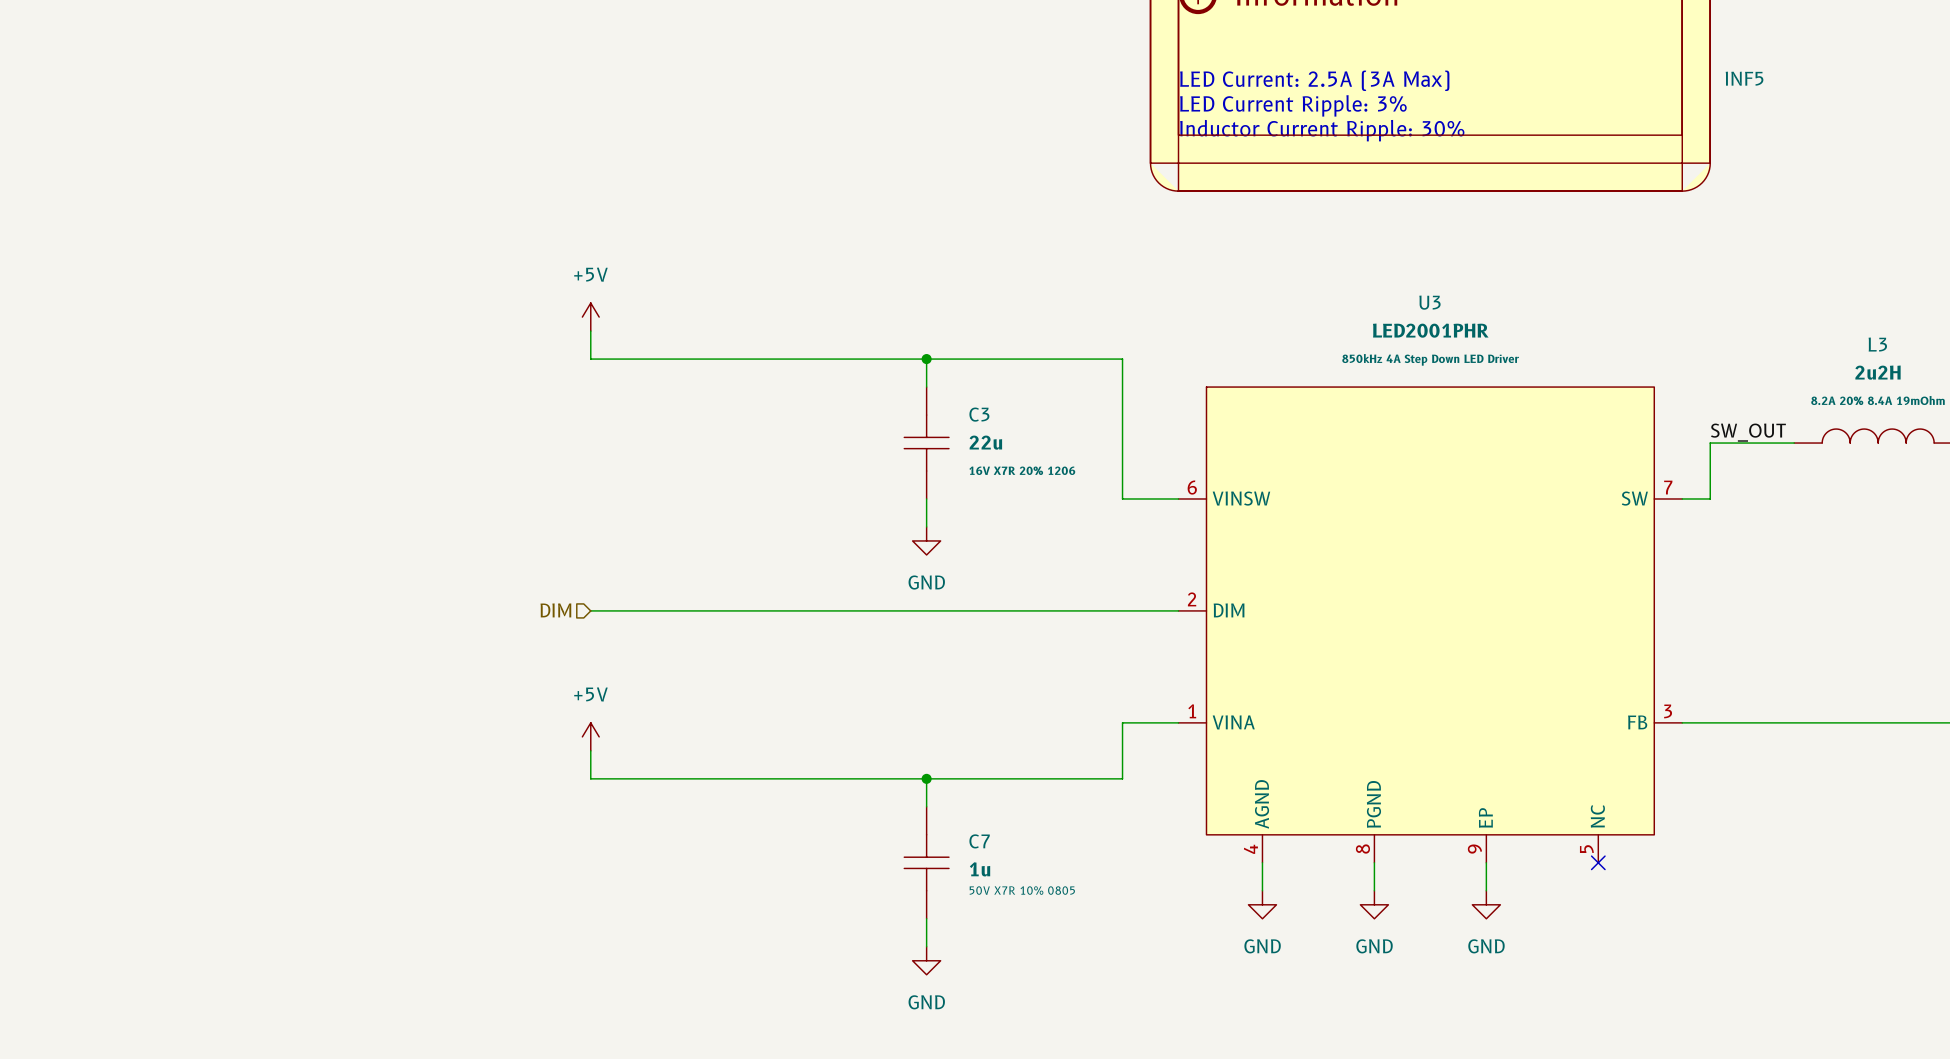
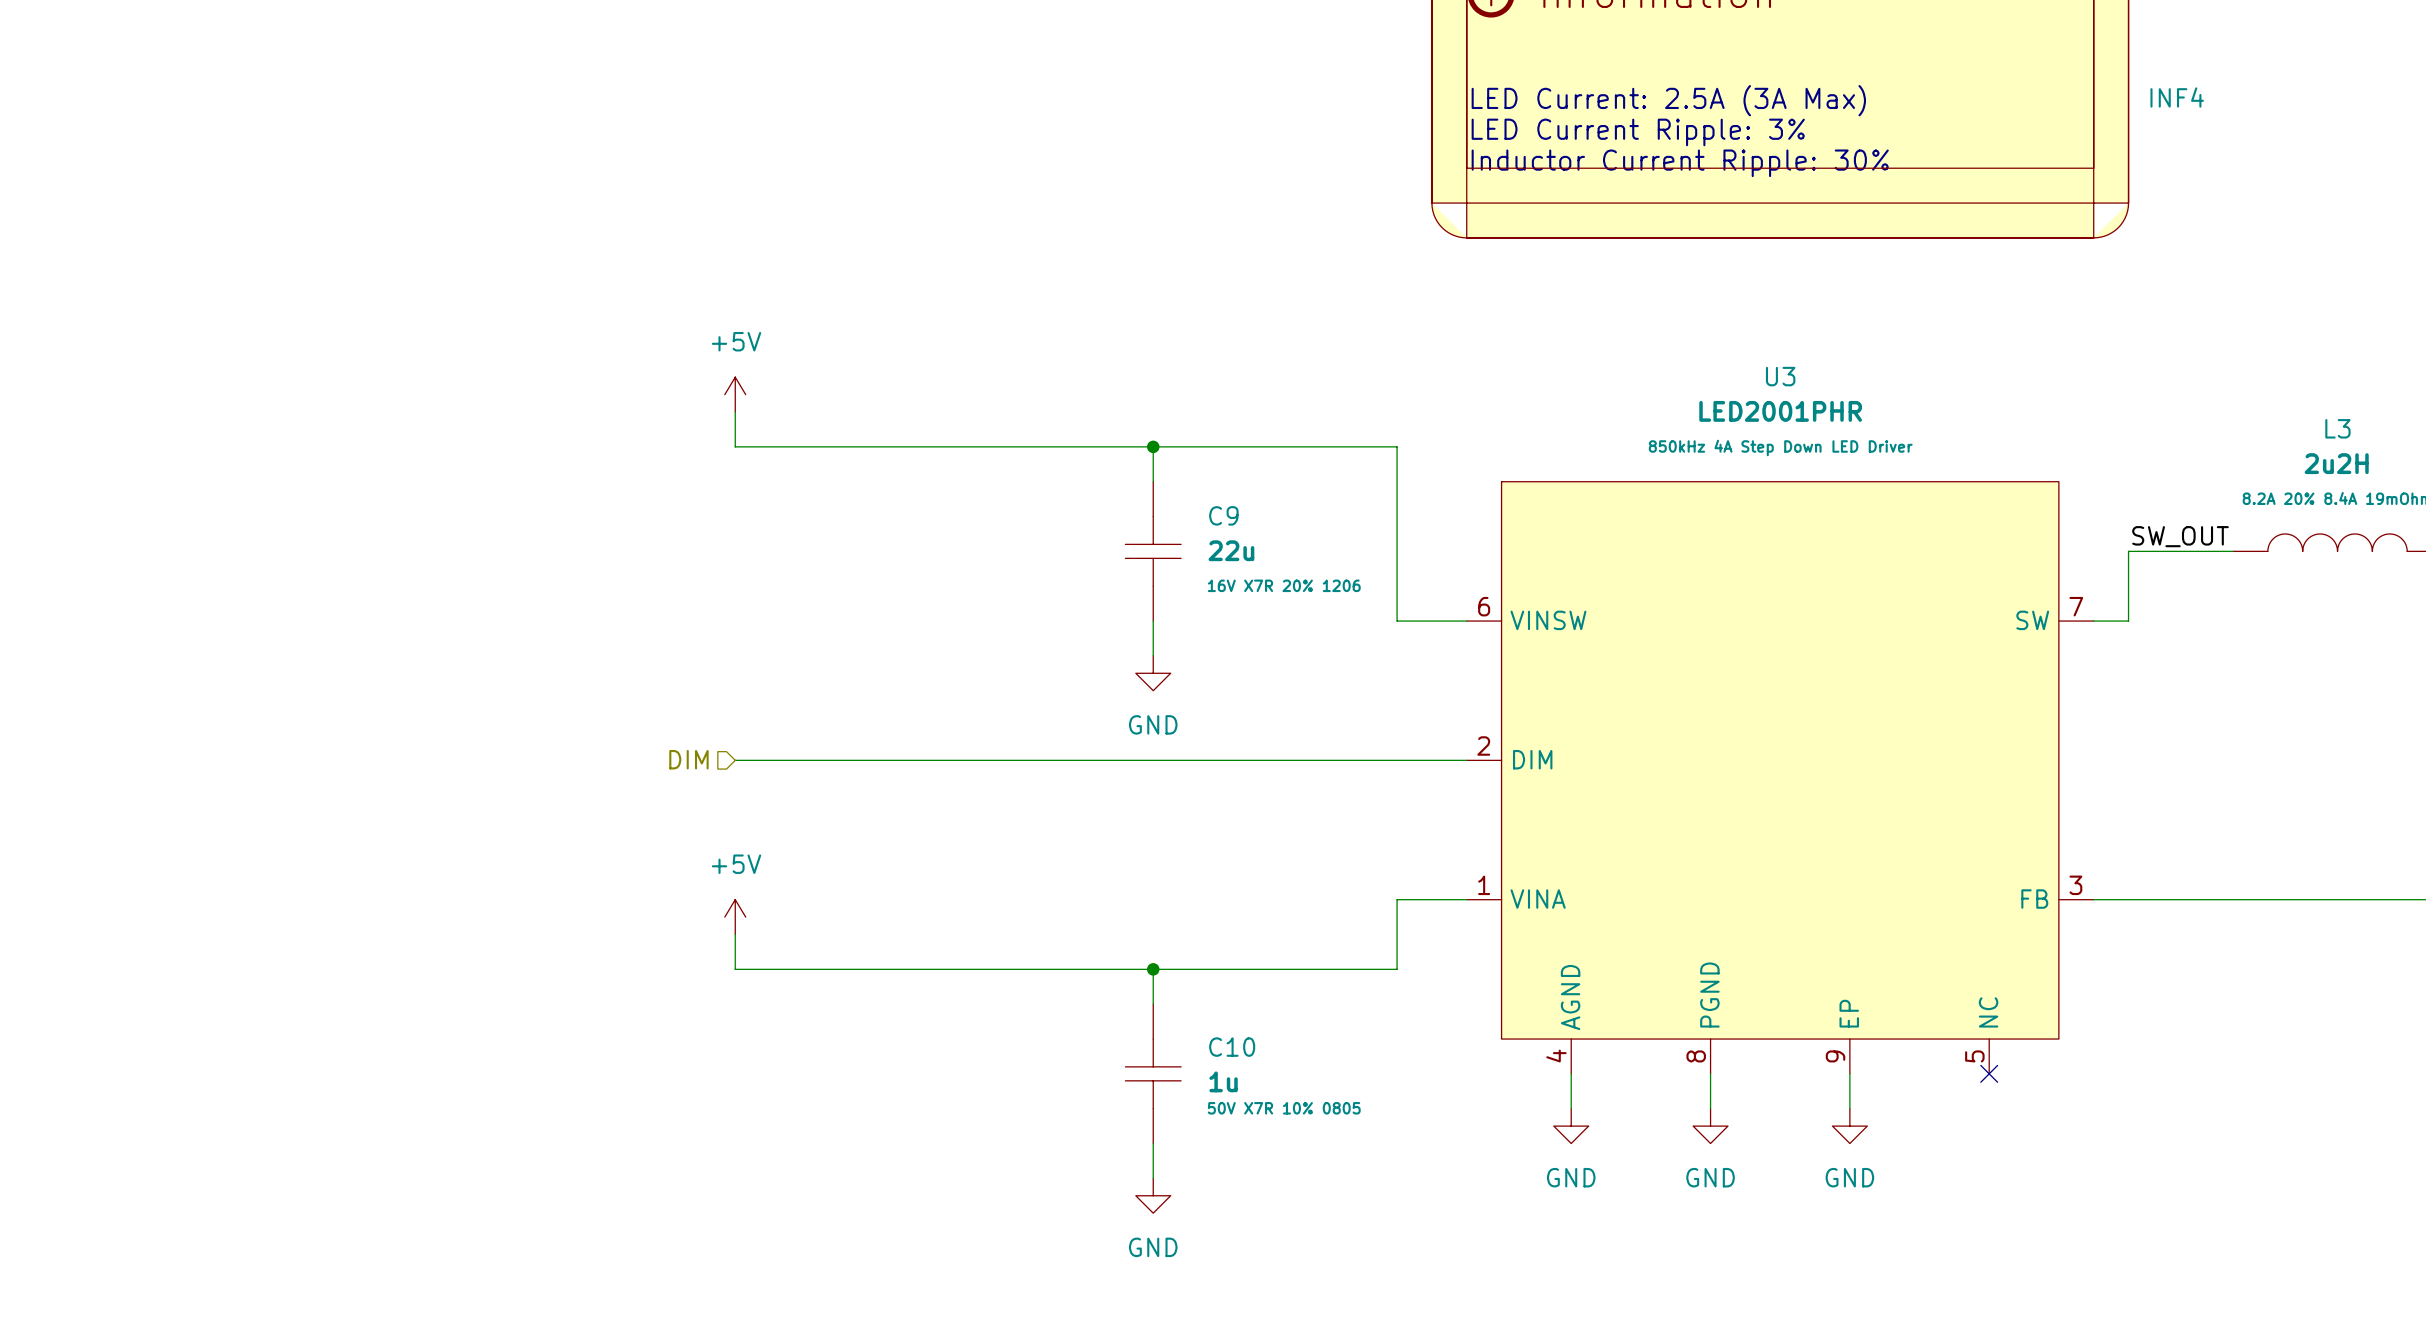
INF5 name: INF5 (1744, 78) -> INF4 (2177, 97)
C3 name: C3 (979, 414) -> C9 (1223, 515)
C7 name: C7 (979, 841) -> C10 (1232, 1047)

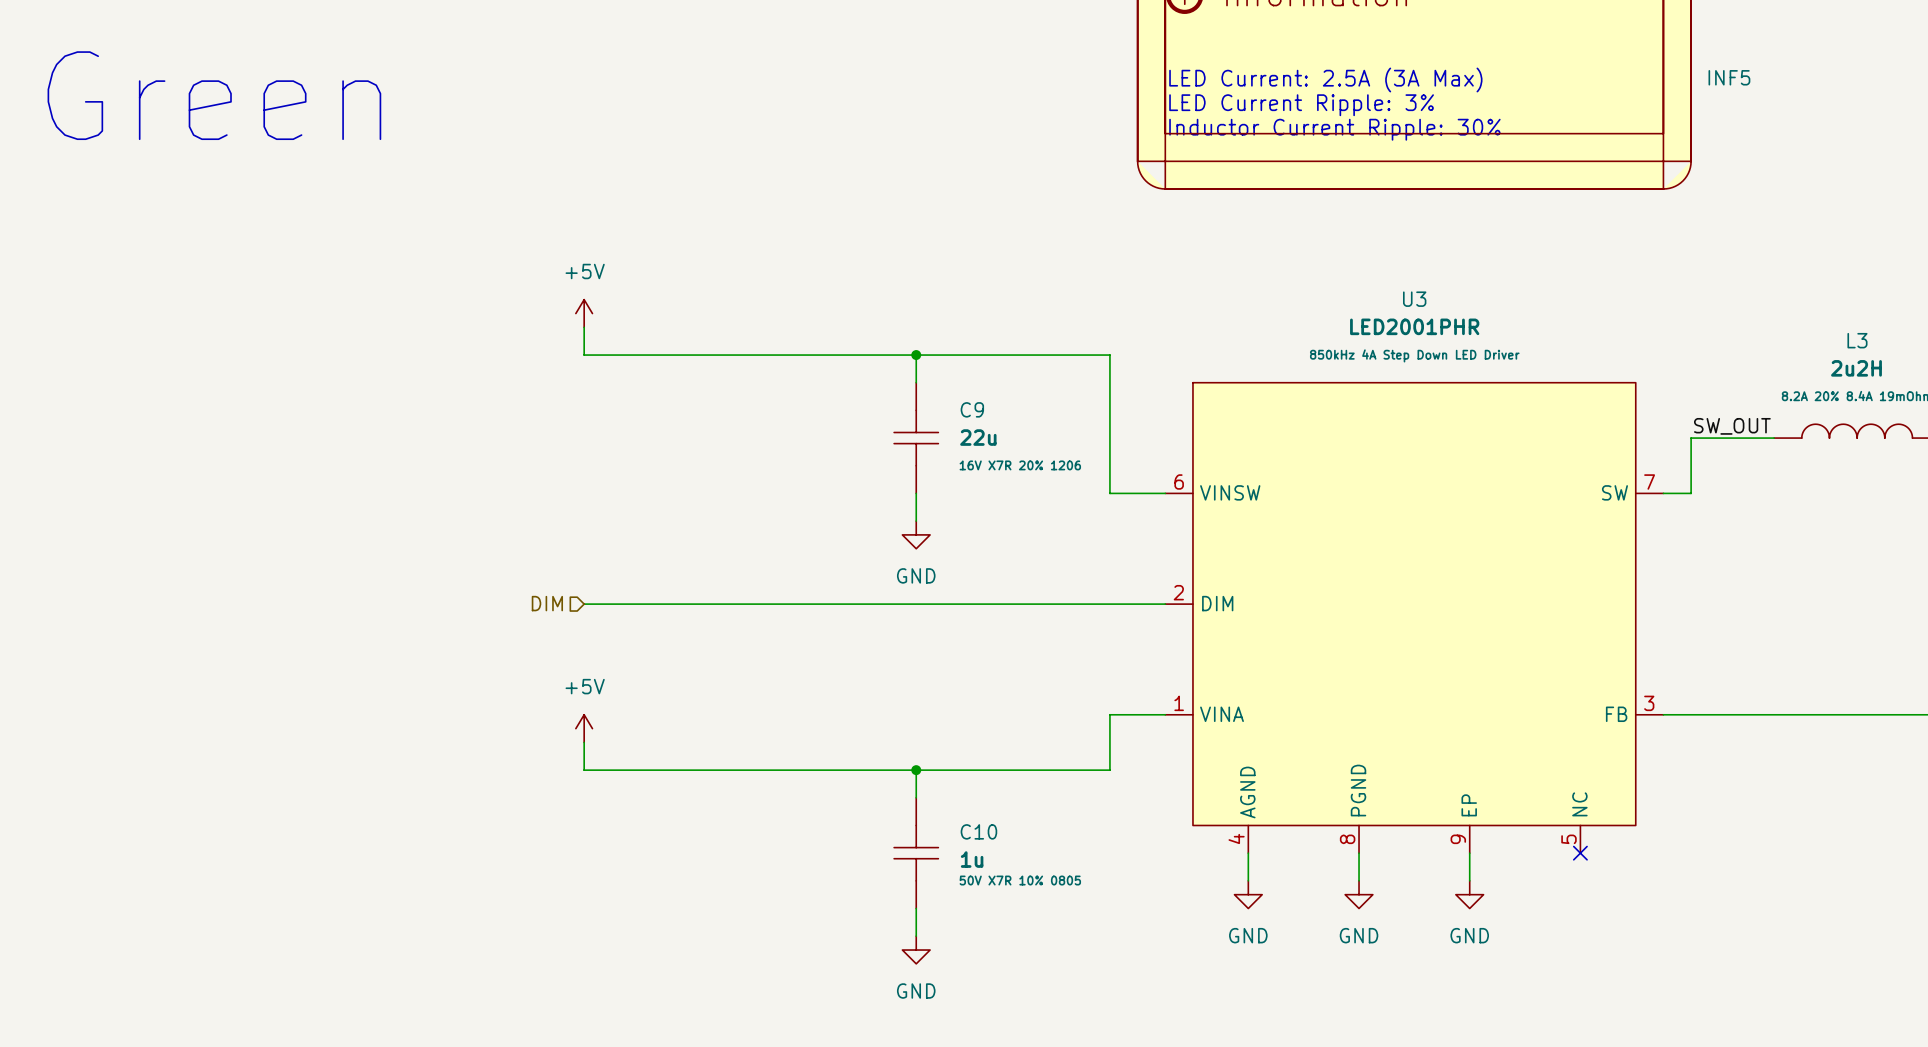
INF4 name: INF4 (2177, 97) -> INF5 (1729, 77)
text: none -> Green (214, 95)

